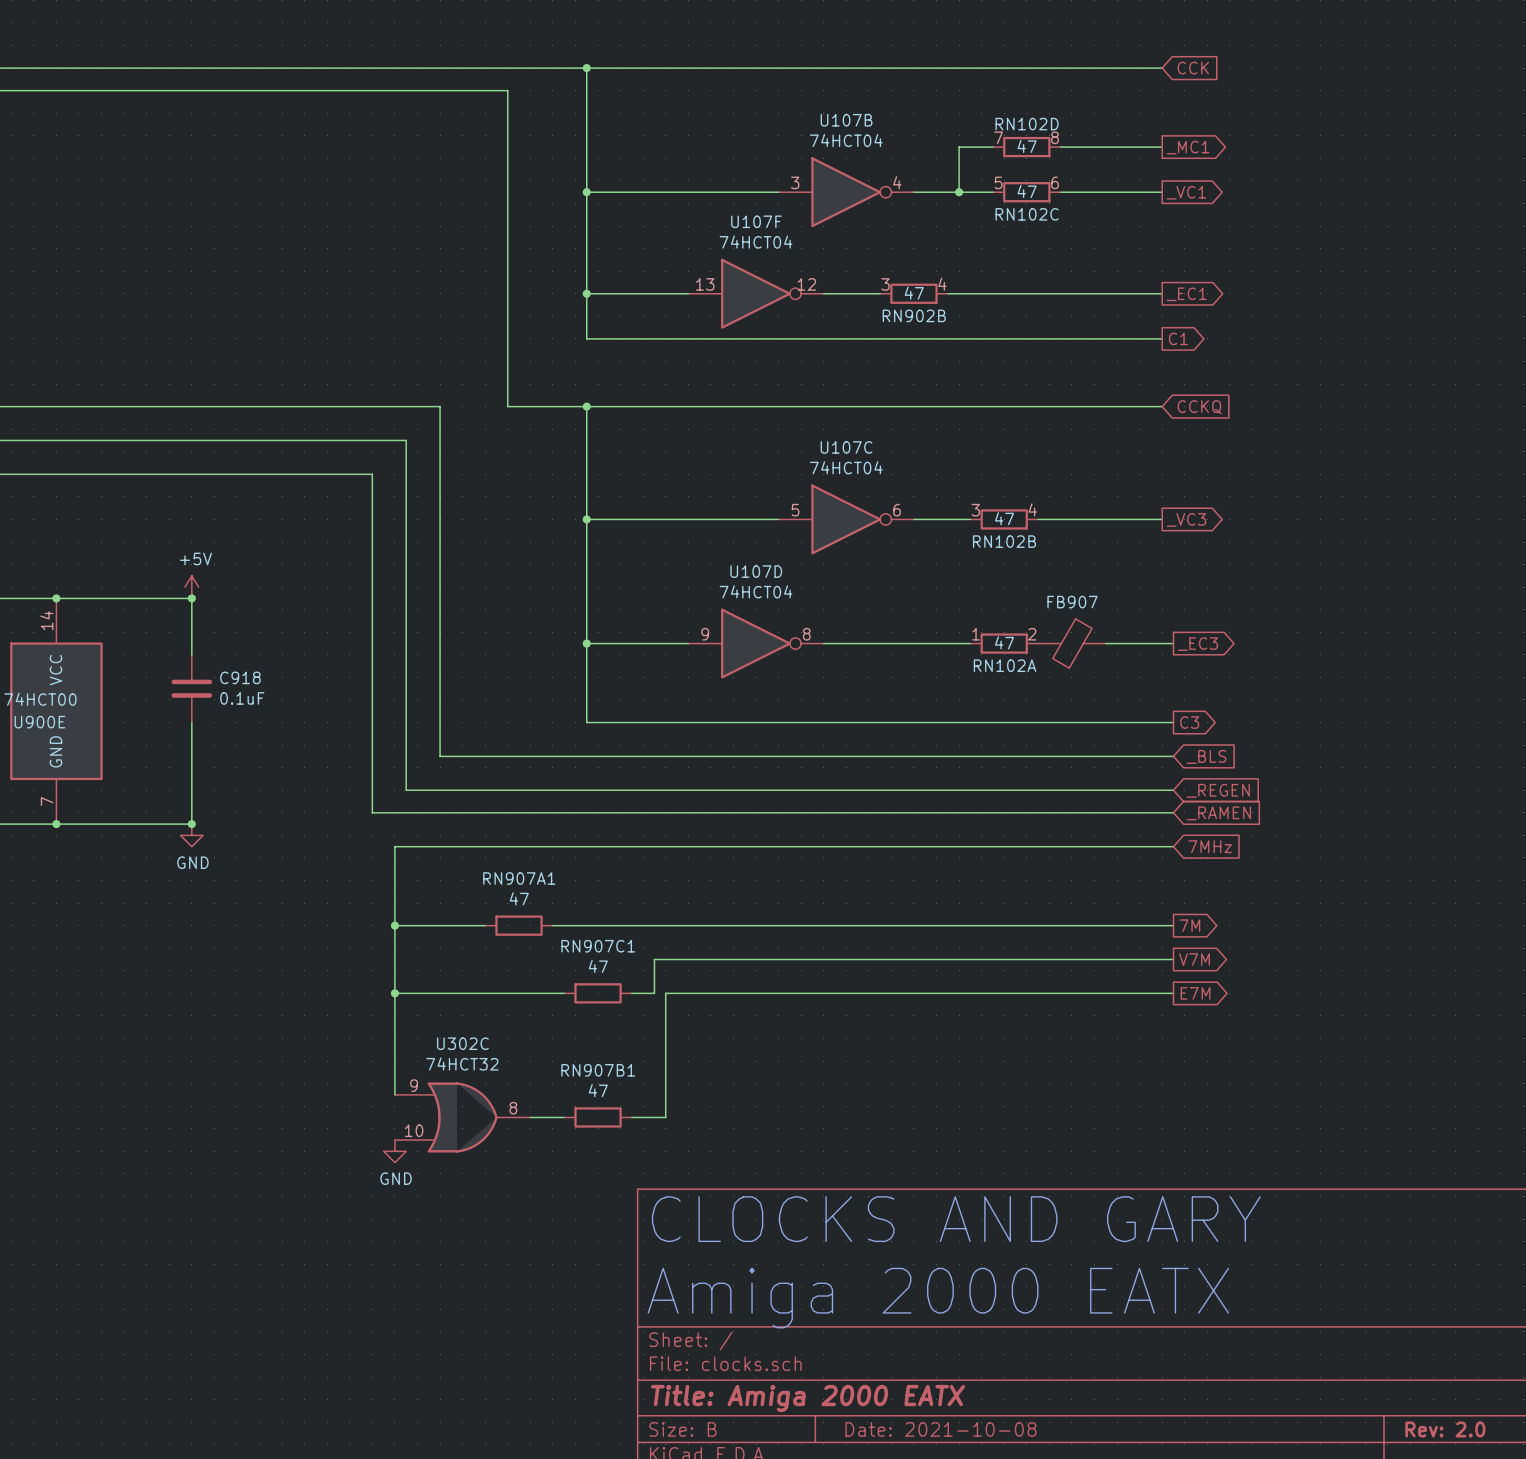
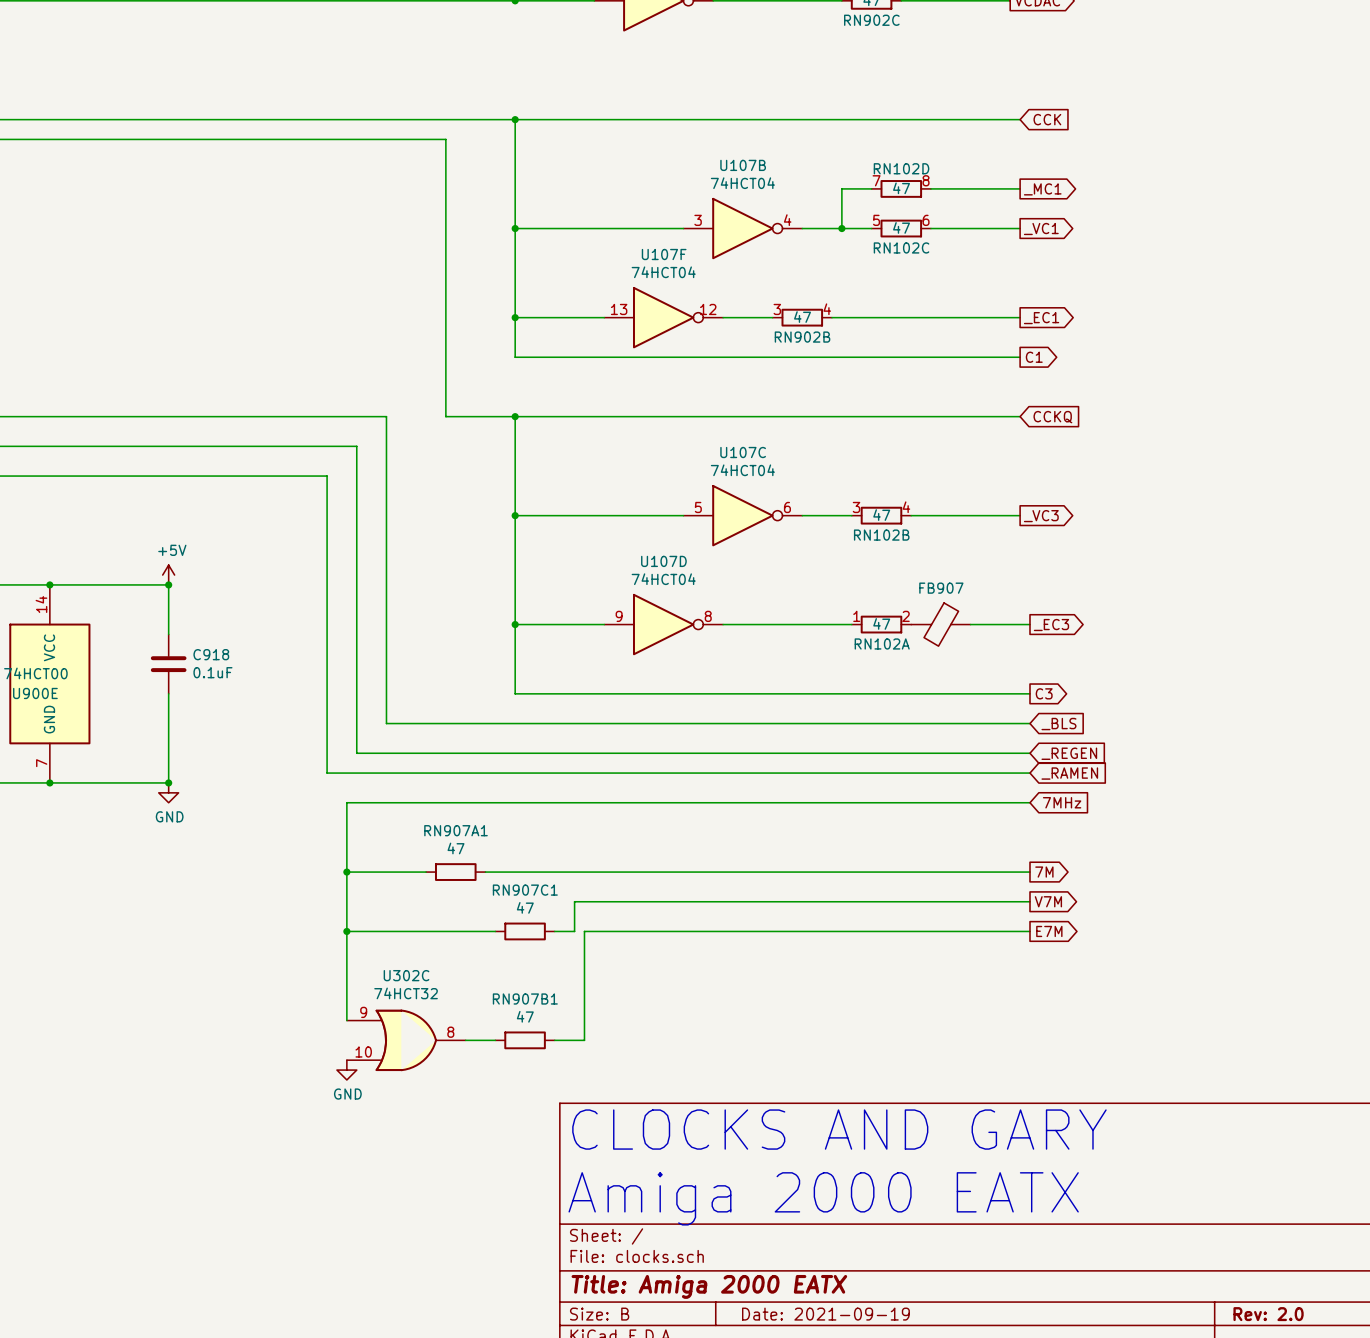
title block: Date: 2021-10-08 (940, 1429) -> Date: 2021-09-19 (825, 1314)

